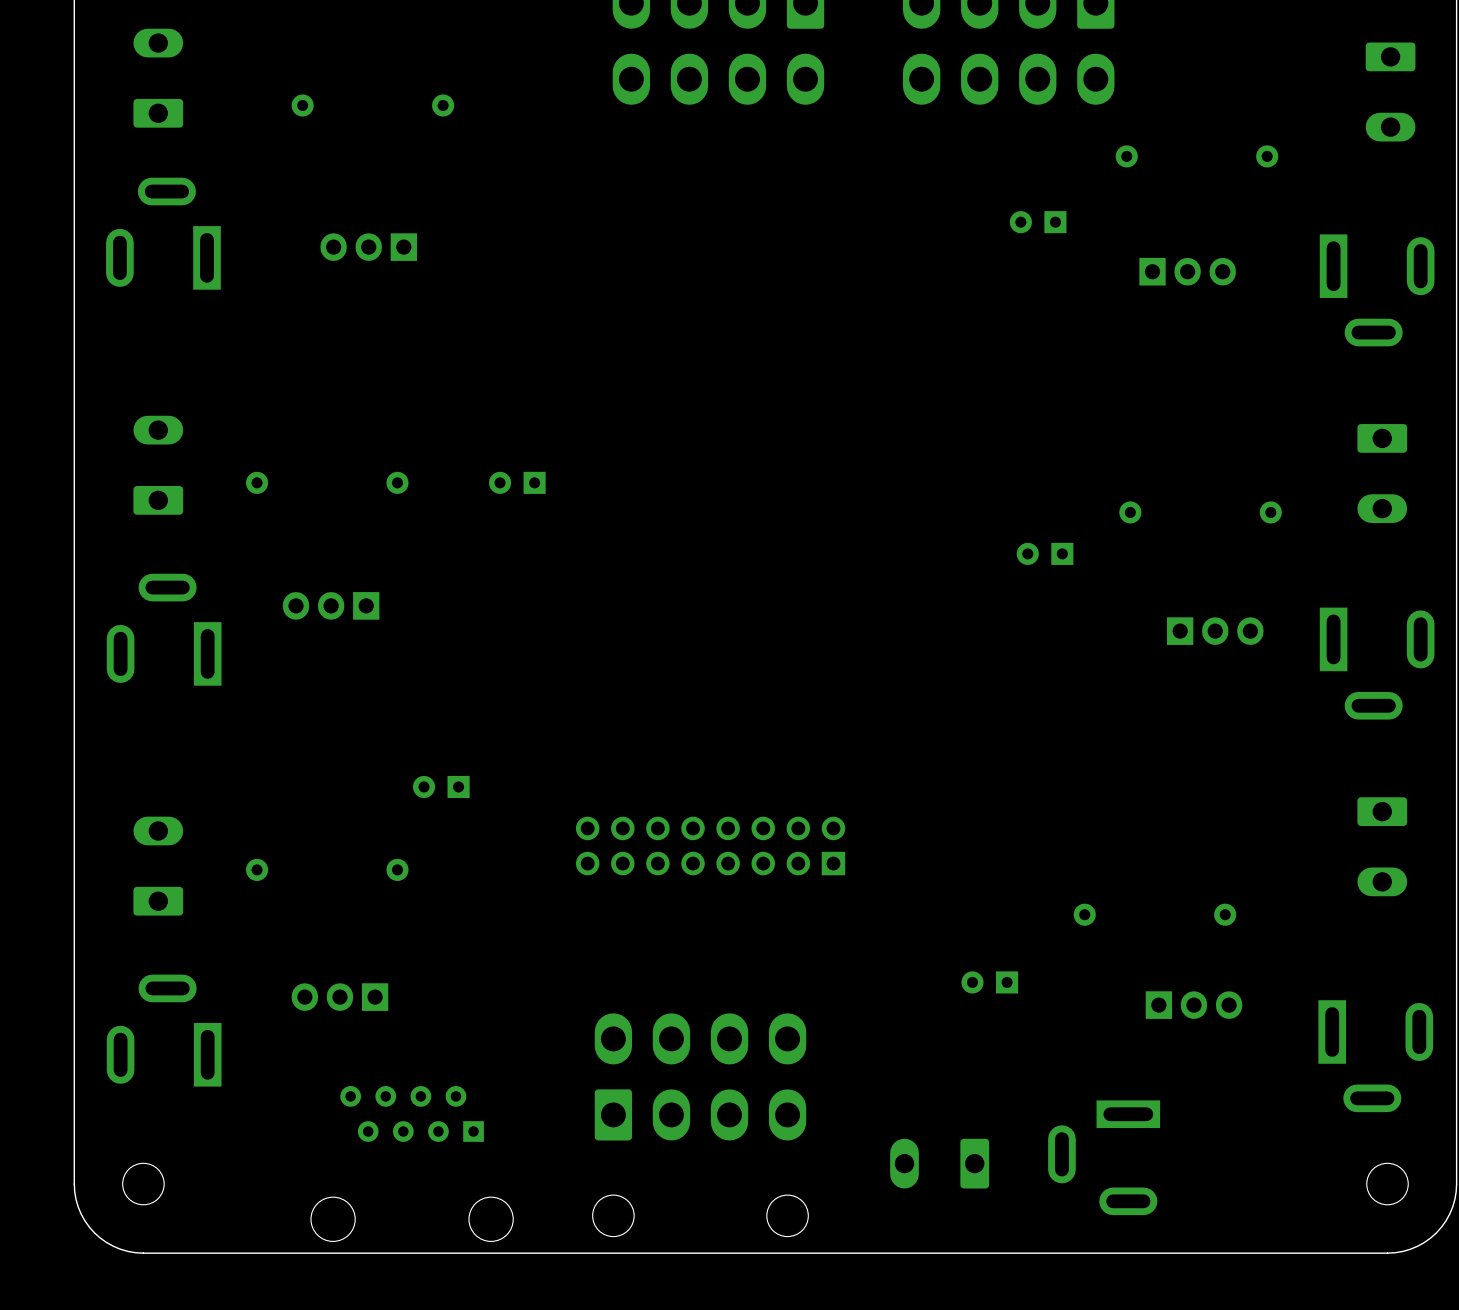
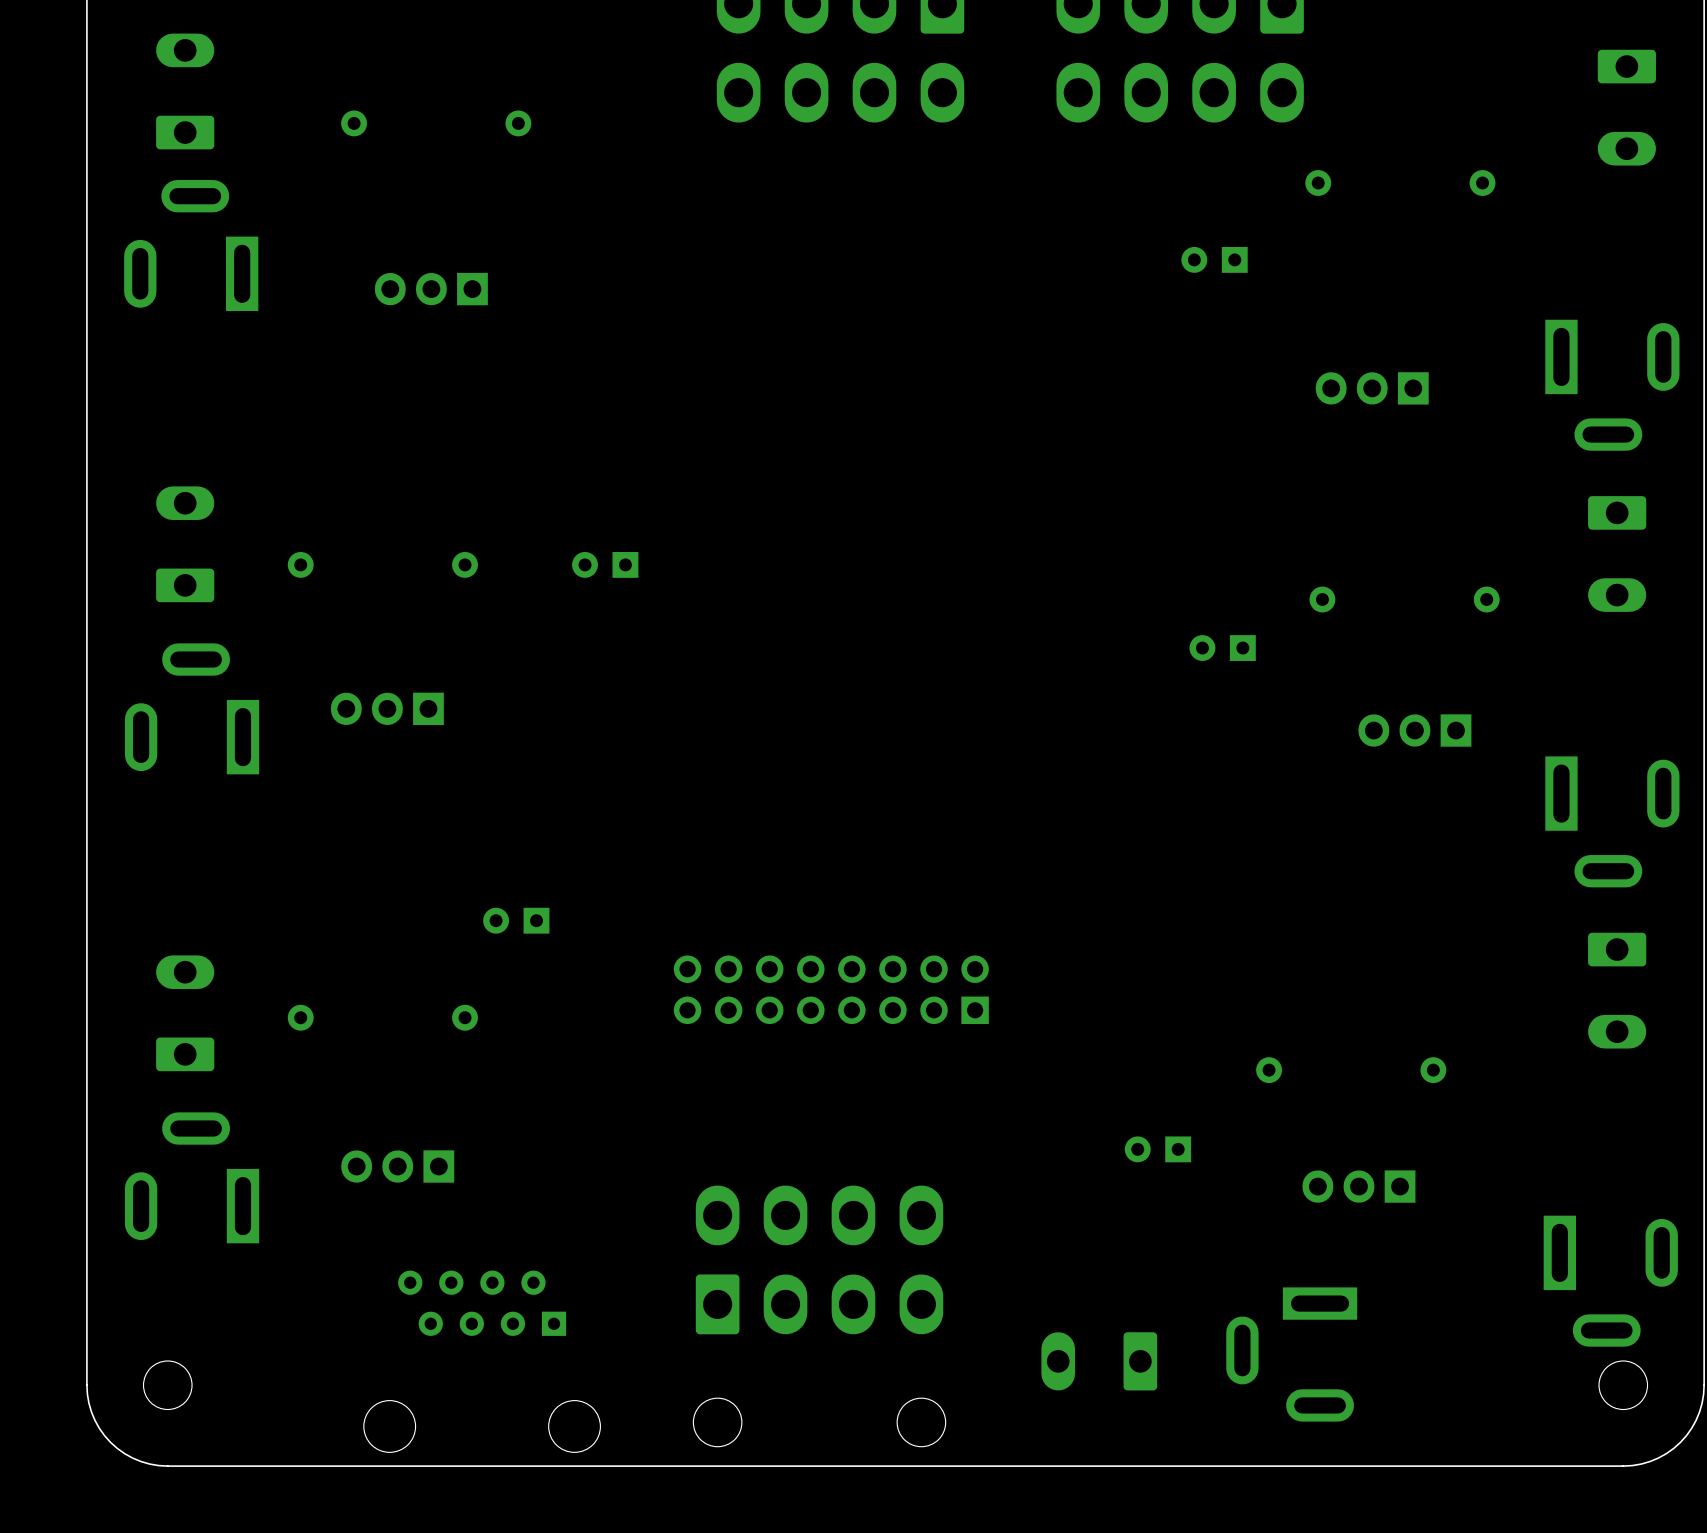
part position: (163, 233) -> (191, 245)
part rotation: 0° (1187, 271) -> 180° (1372, 388)
part position: (1187, 271) -> (1372, 388)
part position: (1377, 290) -> (1612, 385)
part position: (164, 629) -> (192, 708)
part rotation: 0° (1215, 631) -> 180° (1414, 730)
part position: (1377, 663) -> (1612, 821)
part rotation: 0° (1193, 1005) -> 180° (1358, 1186)
part position: (164, 1030) -> (192, 1177)
part position: (1375, 1056) -> (1610, 1281)

